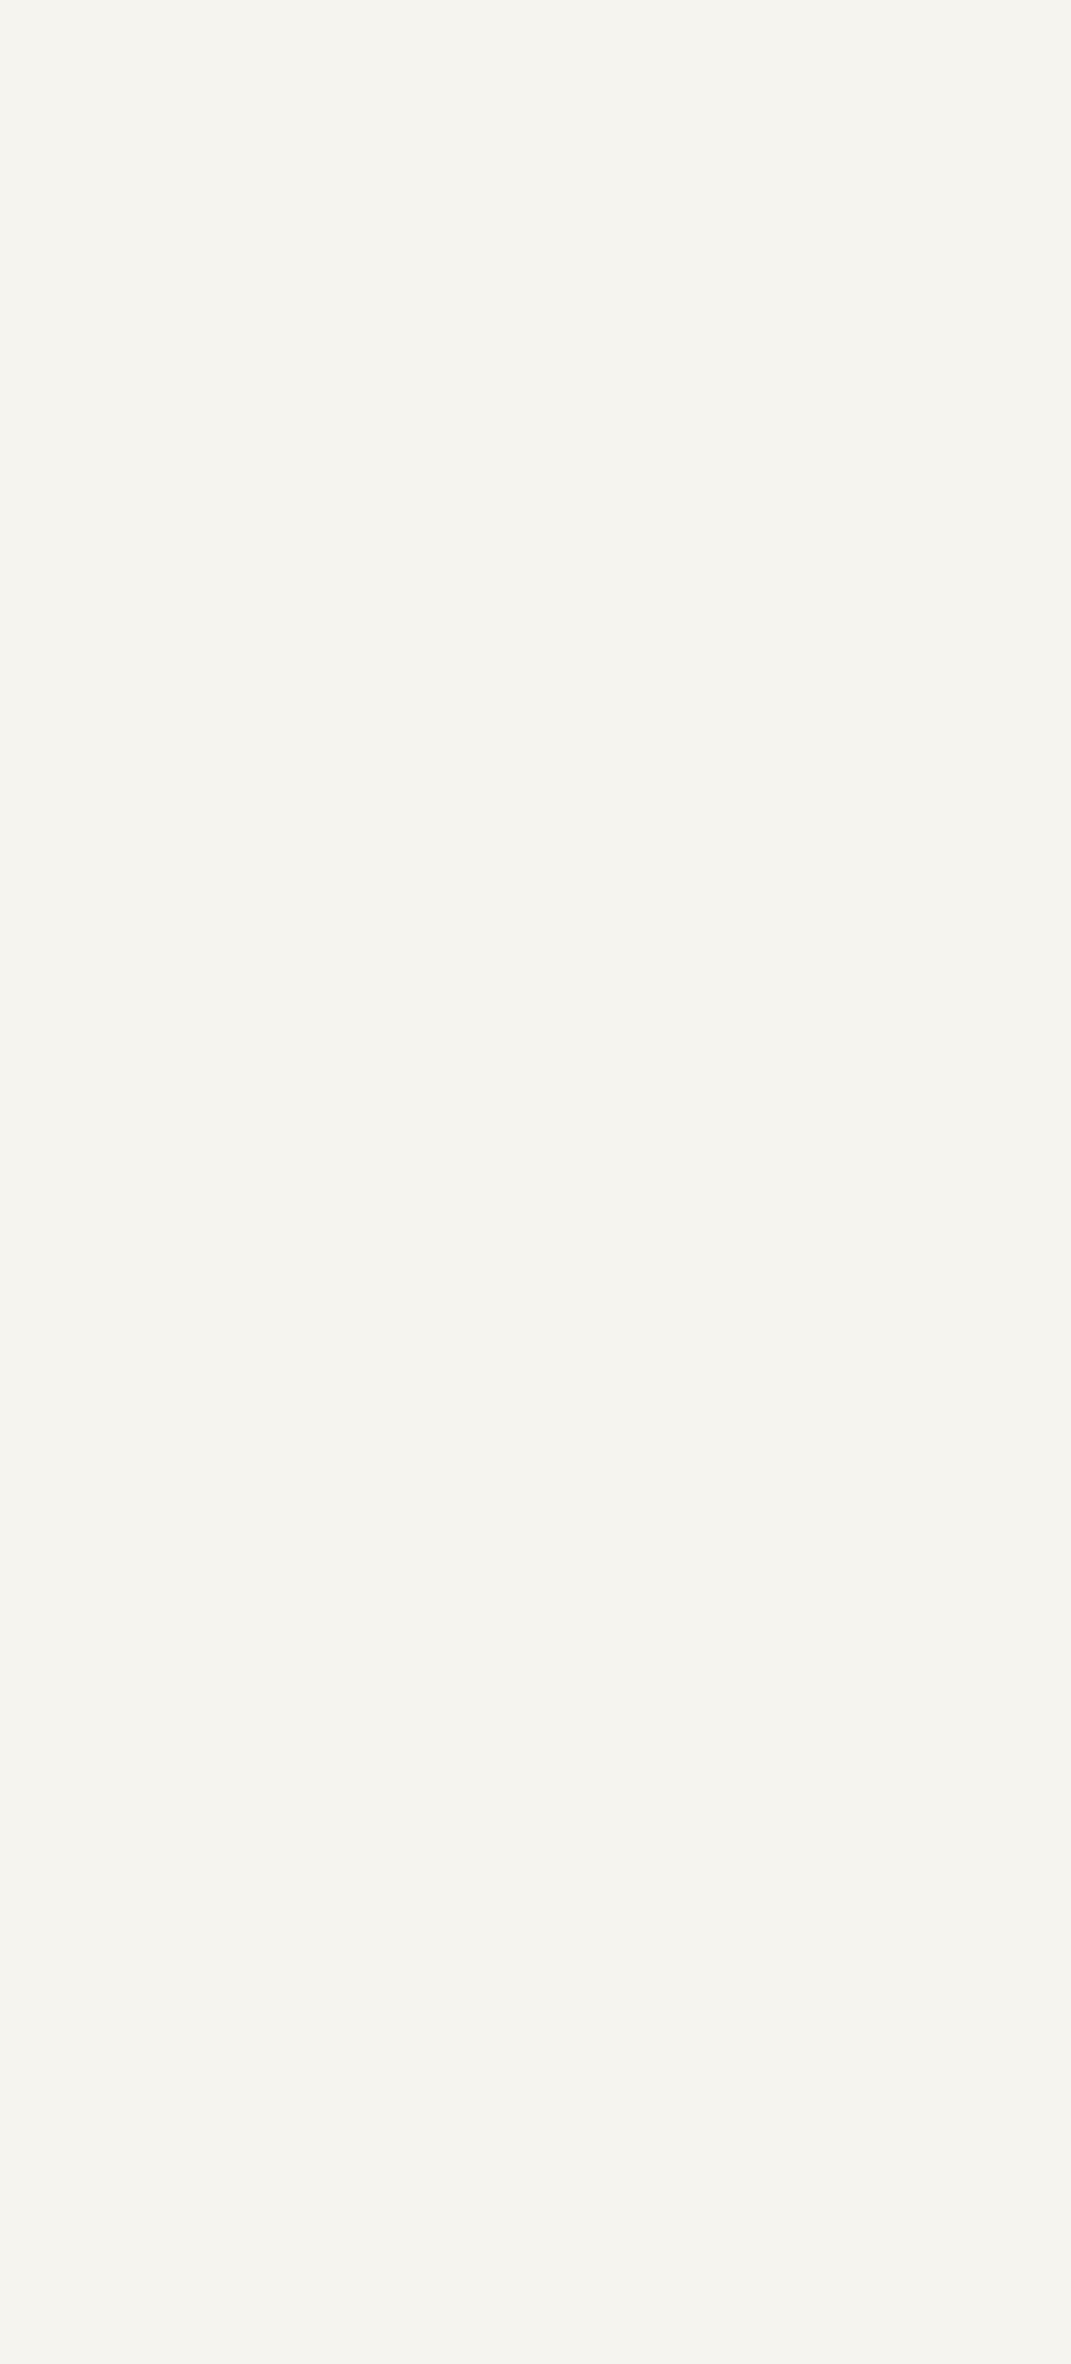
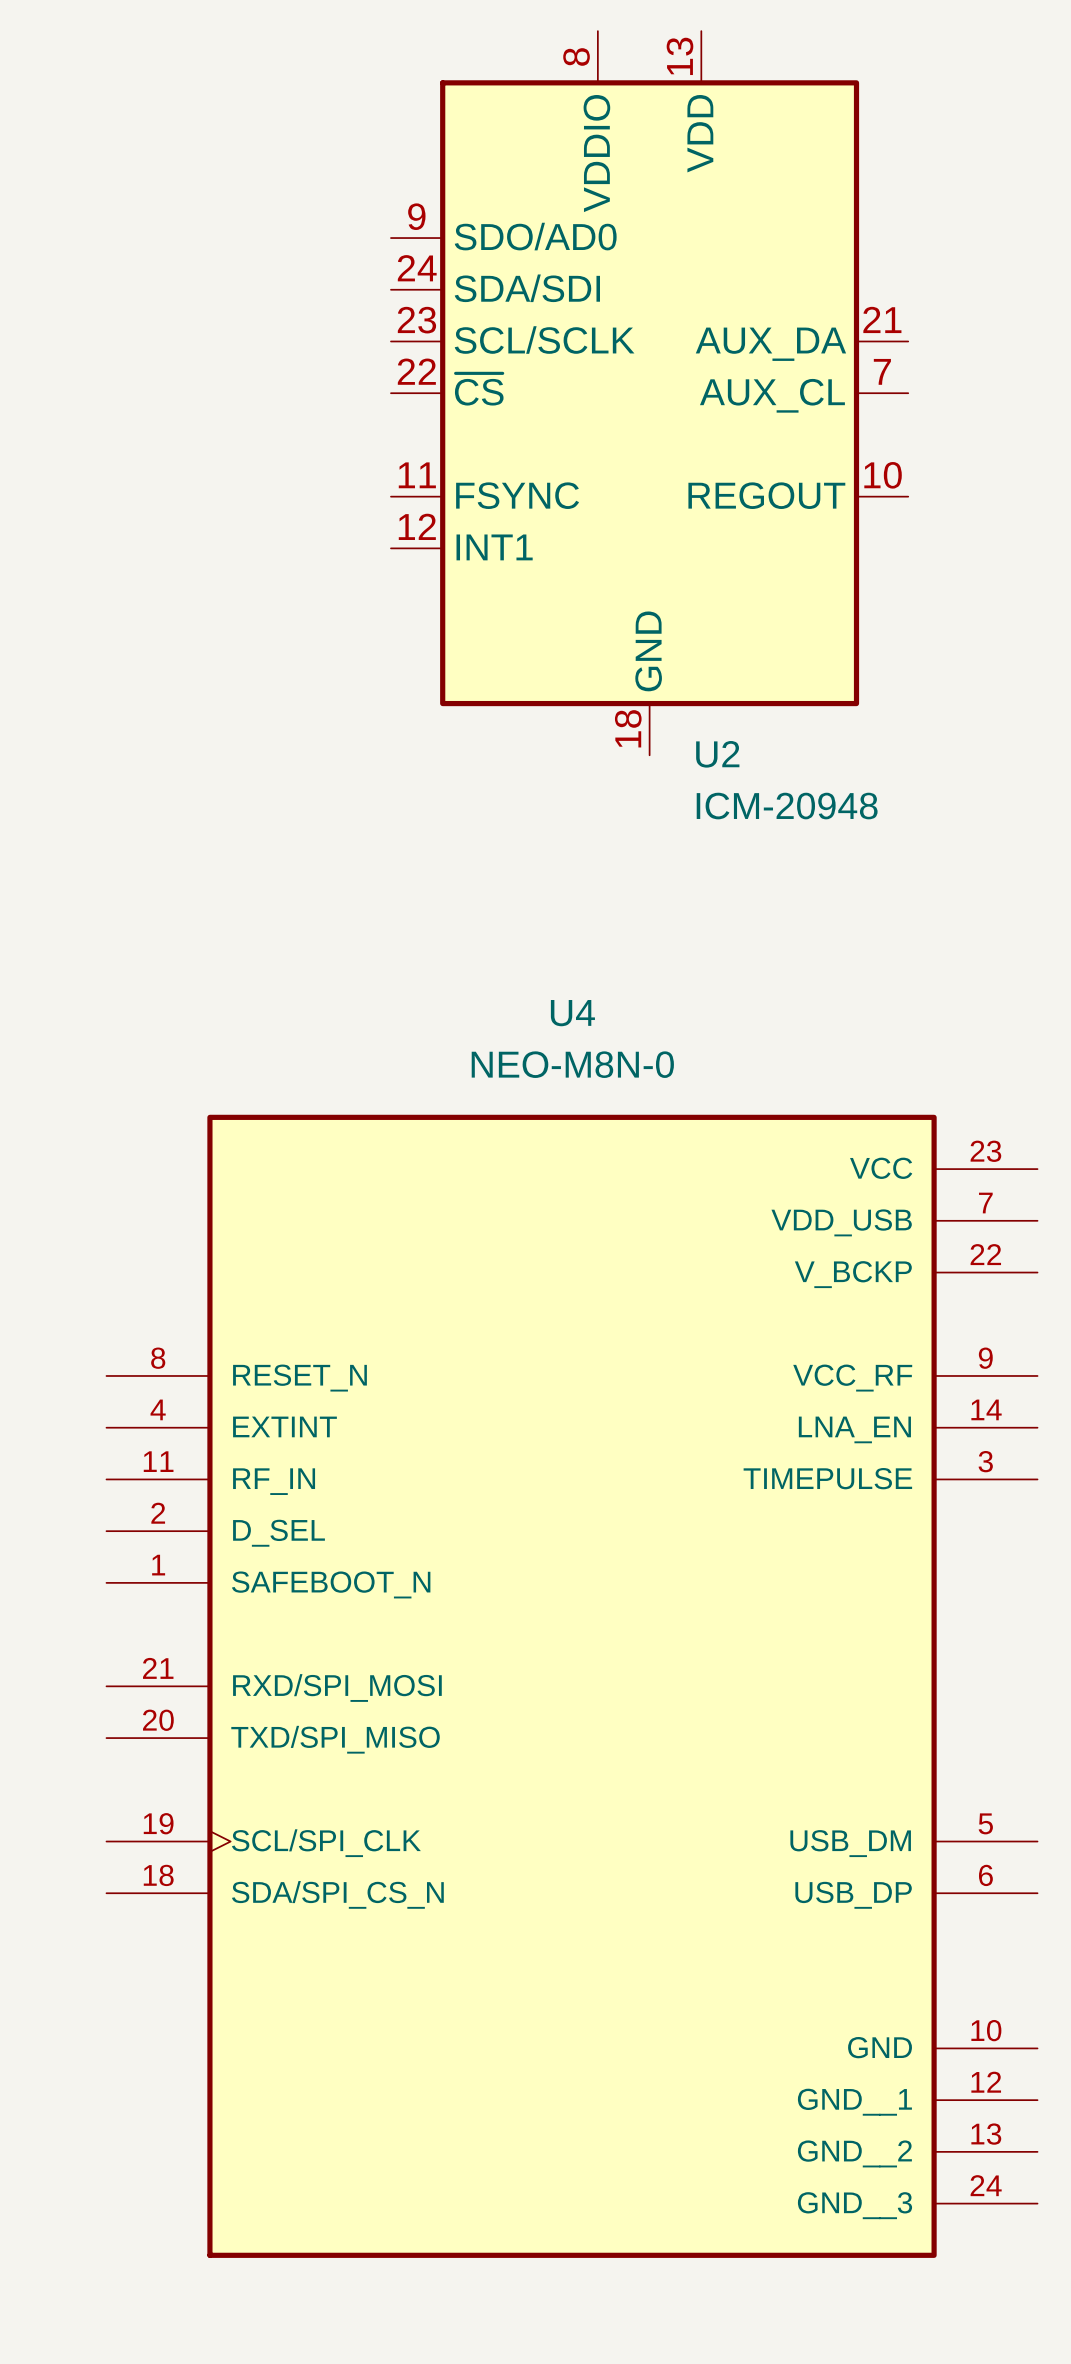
U2: none -> ICM-20948 (649, 393)
U4: none -> NEO-M8N-0 (572, 1686)

